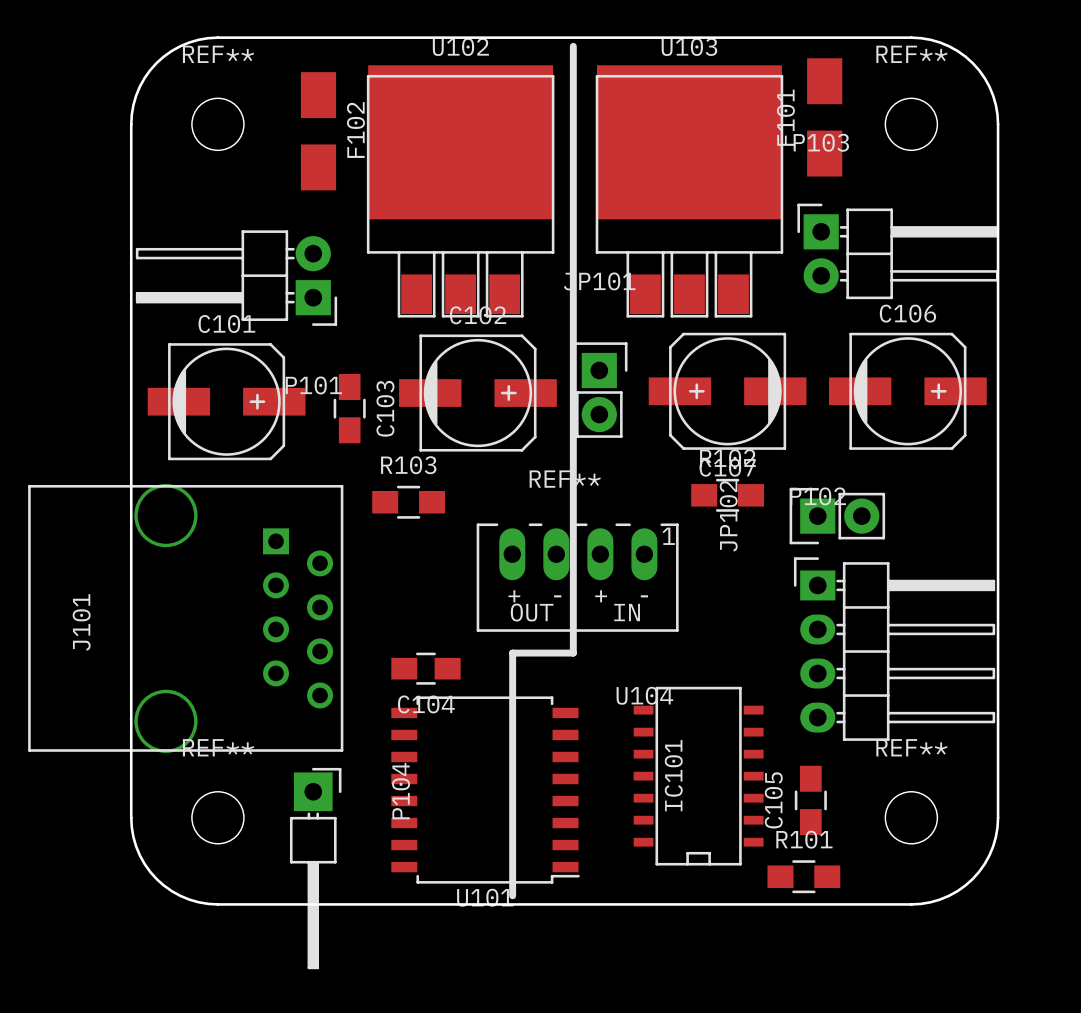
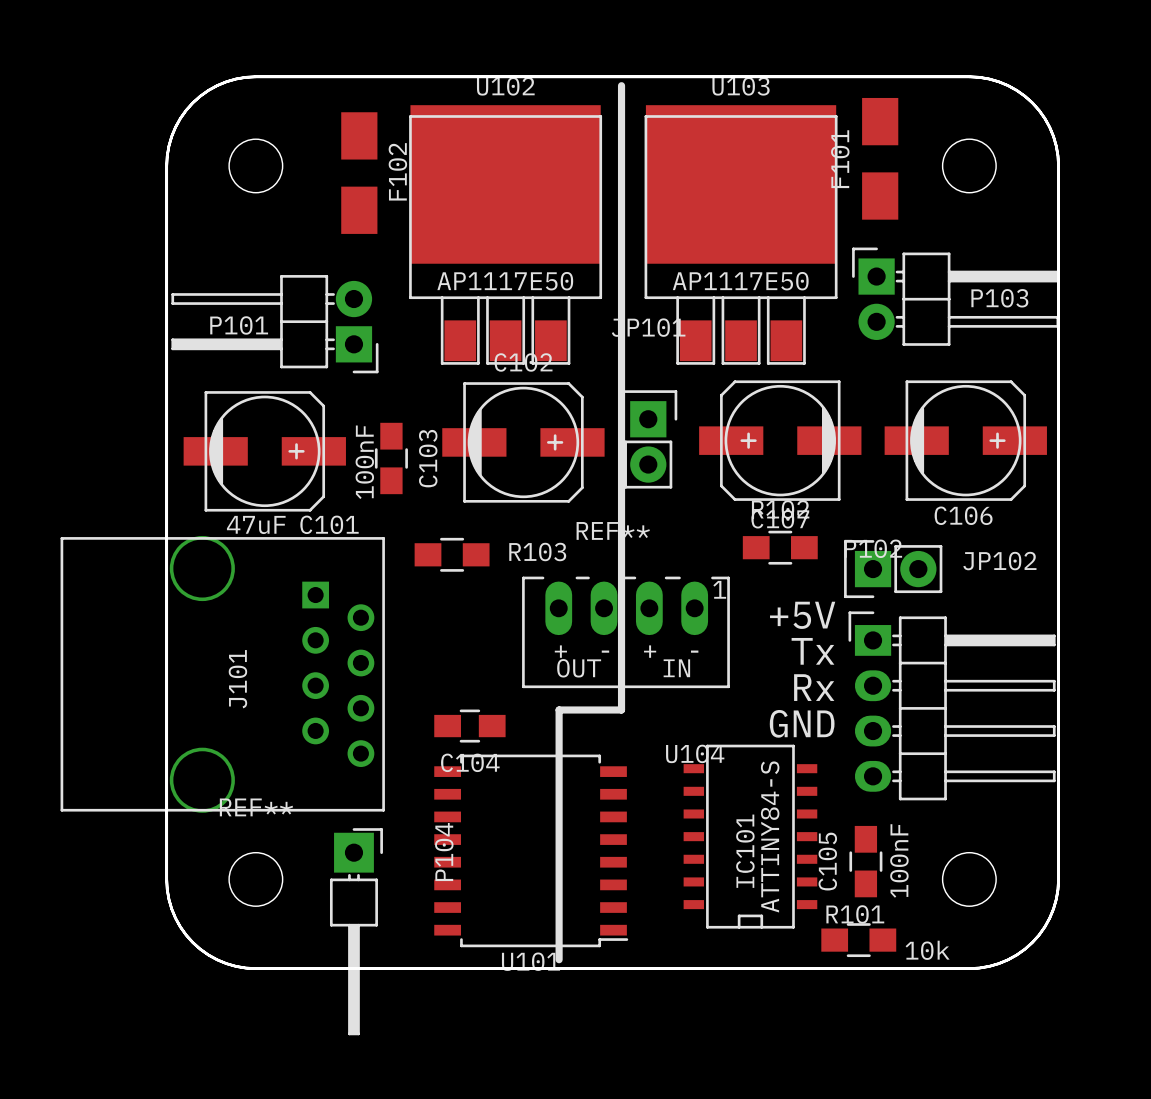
drawing: none -> [165, 75, 1060, 970]
REF** name: REF** (218, 54) -> none
REF** name: REF** (911, 54) -> none
P103 name position: P103 (821, 142) -> P103 (999, 298)
U102 value: none -> AP1117E50 (505, 281)
U103 value: none -> AP1117E50 (740, 281)
C106 name position: C106 (907, 313) -> C106 (963, 515)
C101 name position: C101 (226, 324) -> C101 (329, 524)
P101 name position: P101 (313, 385) -> P101 (239, 325)
C103 value: none -> 100nF (364, 462)
R103 name position: R103 (408, 465) -> R103 (537, 552)
C101 value: none -> 47uF (256, 524)
JP102 name rotation: 0° (728, 515) -> 90° clockwise (999, 561)
JP102 name position: JP102 (728, 515) -> JP102 (999, 561)
text: none -> +5V (802, 615)
text: none -> Tx (812, 651)
J101 name position: J101 (81, 622) -> J101 (237, 679)
text: none -> Rx (814, 687)
text: none -> GND (802, 723)
REF** name: REF** (911, 747) -> none
IC101 name position: IC101 (673, 775) -> IC101 (745, 851)
IC101 value: none -> ATTINY84-S (770, 836)
C105 value: none -> 100nF (899, 860)
R101 name position: R101 (804, 839) -> R101 (855, 914)
R101 value: none -> 10k (927, 950)

